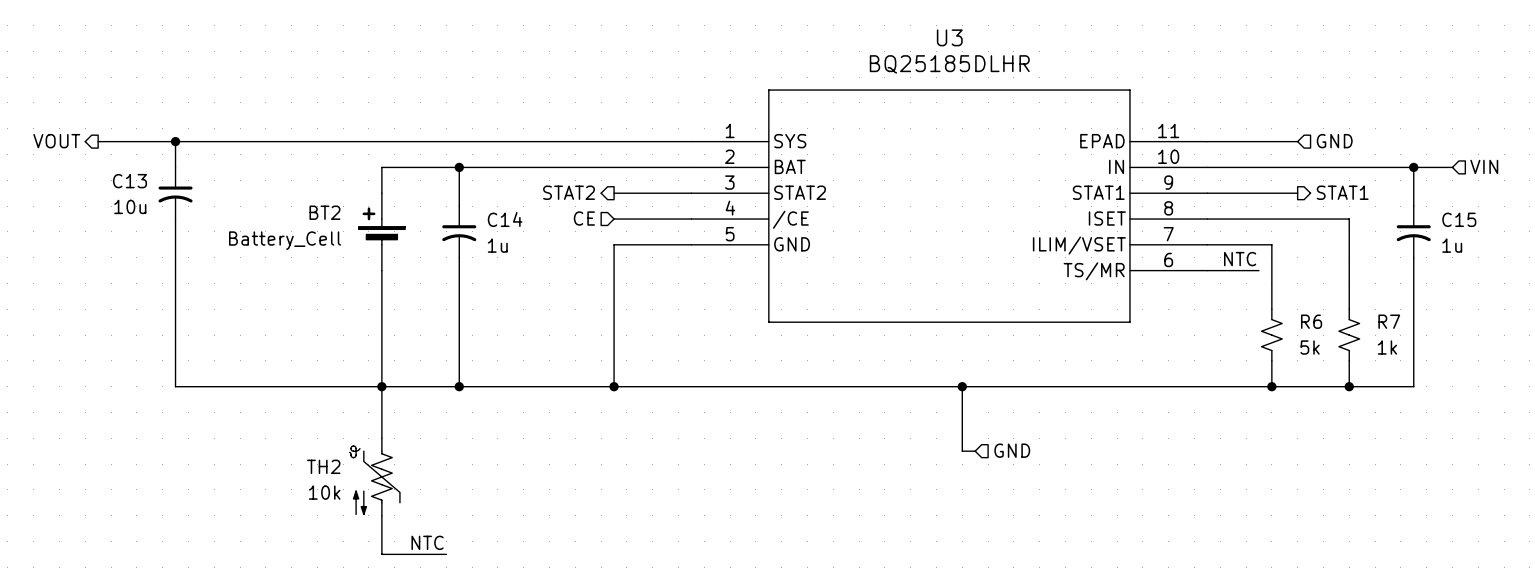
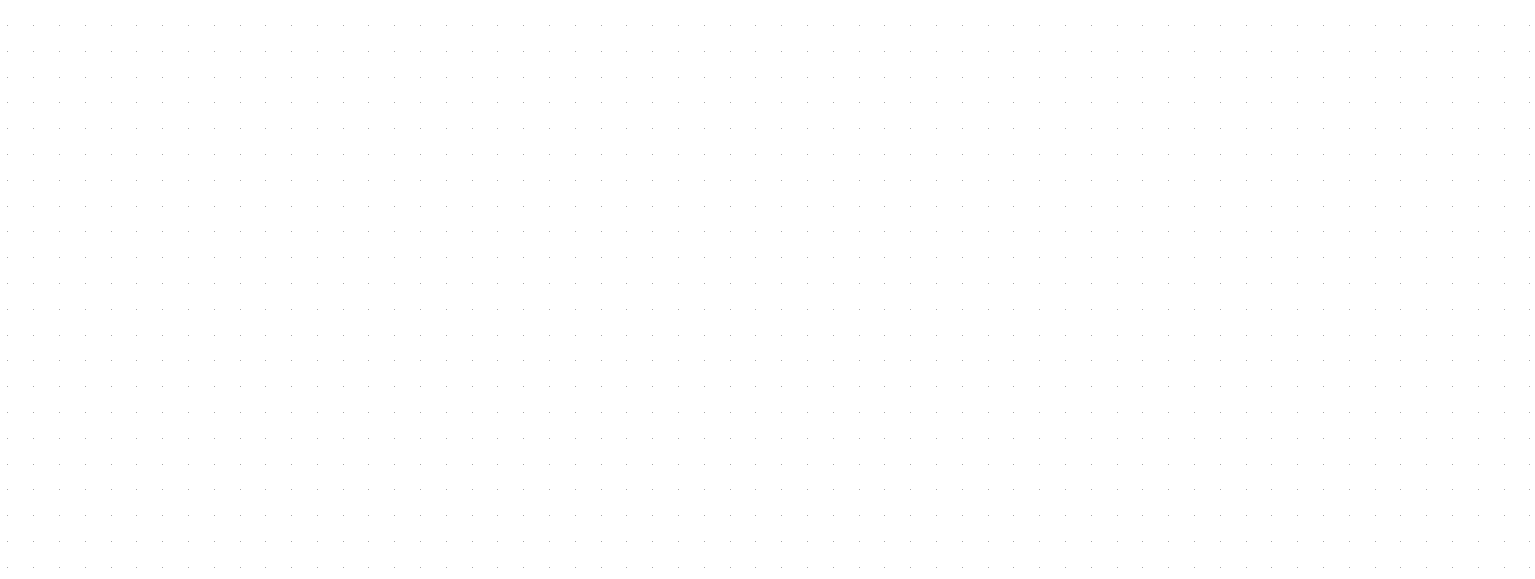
hierarchical label: VOUT (56, 141) -> none
wire: (98, 141) (691, 141) -> none
wire: (175, 141) (175, 167) -> none
junction: (175, 141) -> none
wire: (1207, 141) (1297, 141) -> none
hierarchical label: GND (1334, 141) -> none
hierarchical label: VIN (1484, 166) -> none
wire: (459, 167) (459, 206) -> none
junction: (459, 167) -> none
wire: (691, 167) (381, 167) (381, 193) -> none
wire: (1207, 167) (1452, 167) -> none
wire: (1413, 167) (1413, 206) -> none
junction: (1413, 167) -> none
hierarchical label: STAT2 (569, 192) -> none
hierarchical label: STAT1 (1342, 192) -> none
C13: 10u (175, 193) -> none
wire: (614, 193) (691, 193) -> none
wire: (1207, 193) (1297, 193) -> none
U3: BQ25185DLHR (949, 206) -> none
hierarchical label: CE (584, 218) -> none
wire: (175, 219) (175, 386) (1413, 386) (1413, 257) -> none
wire: (614, 219) (691, 219) -> none
wire: (1207, 219) (1349, 219) (1349, 309) -> none
BT2: Battery_Cell (381, 231) -> none
C14: 1u (459, 231) -> none
C15: 1u (1413, 231) -> none
wire: (691, 244) (614, 244) (614, 386) -> none
wire: (1207, 244) (1271, 244) (1271, 309) -> none
wire: (459, 257) (459, 386) -> none
label: NTC (1240, 259) -> none
wire: (381, 270) (381, 438) -> none
wire: (1207, 270) (1258, 270) -> none
R6: 5k (1271, 335) -> none
R7: 1k (1349, 335) -> none
wire: (1271, 360) (1271, 386) -> none
wire: (1349, 360) (1349, 386) -> none
junction: (381, 386) -> none
junction: (459, 386) -> none
junction: (614, 386) -> none
wire: (962, 386) (962, 451) (975, 451) -> none
junction: (962, 386) -> none
junction: (1271, 386) -> none
junction: (1349, 386) -> none
hierarchical label: GND (1012, 450) -> none
TH2: 10k (374, 476) -> none
wire: (381, 515) (381, 554) (446, 554) -> none
label: NTC (427, 542) -> none

